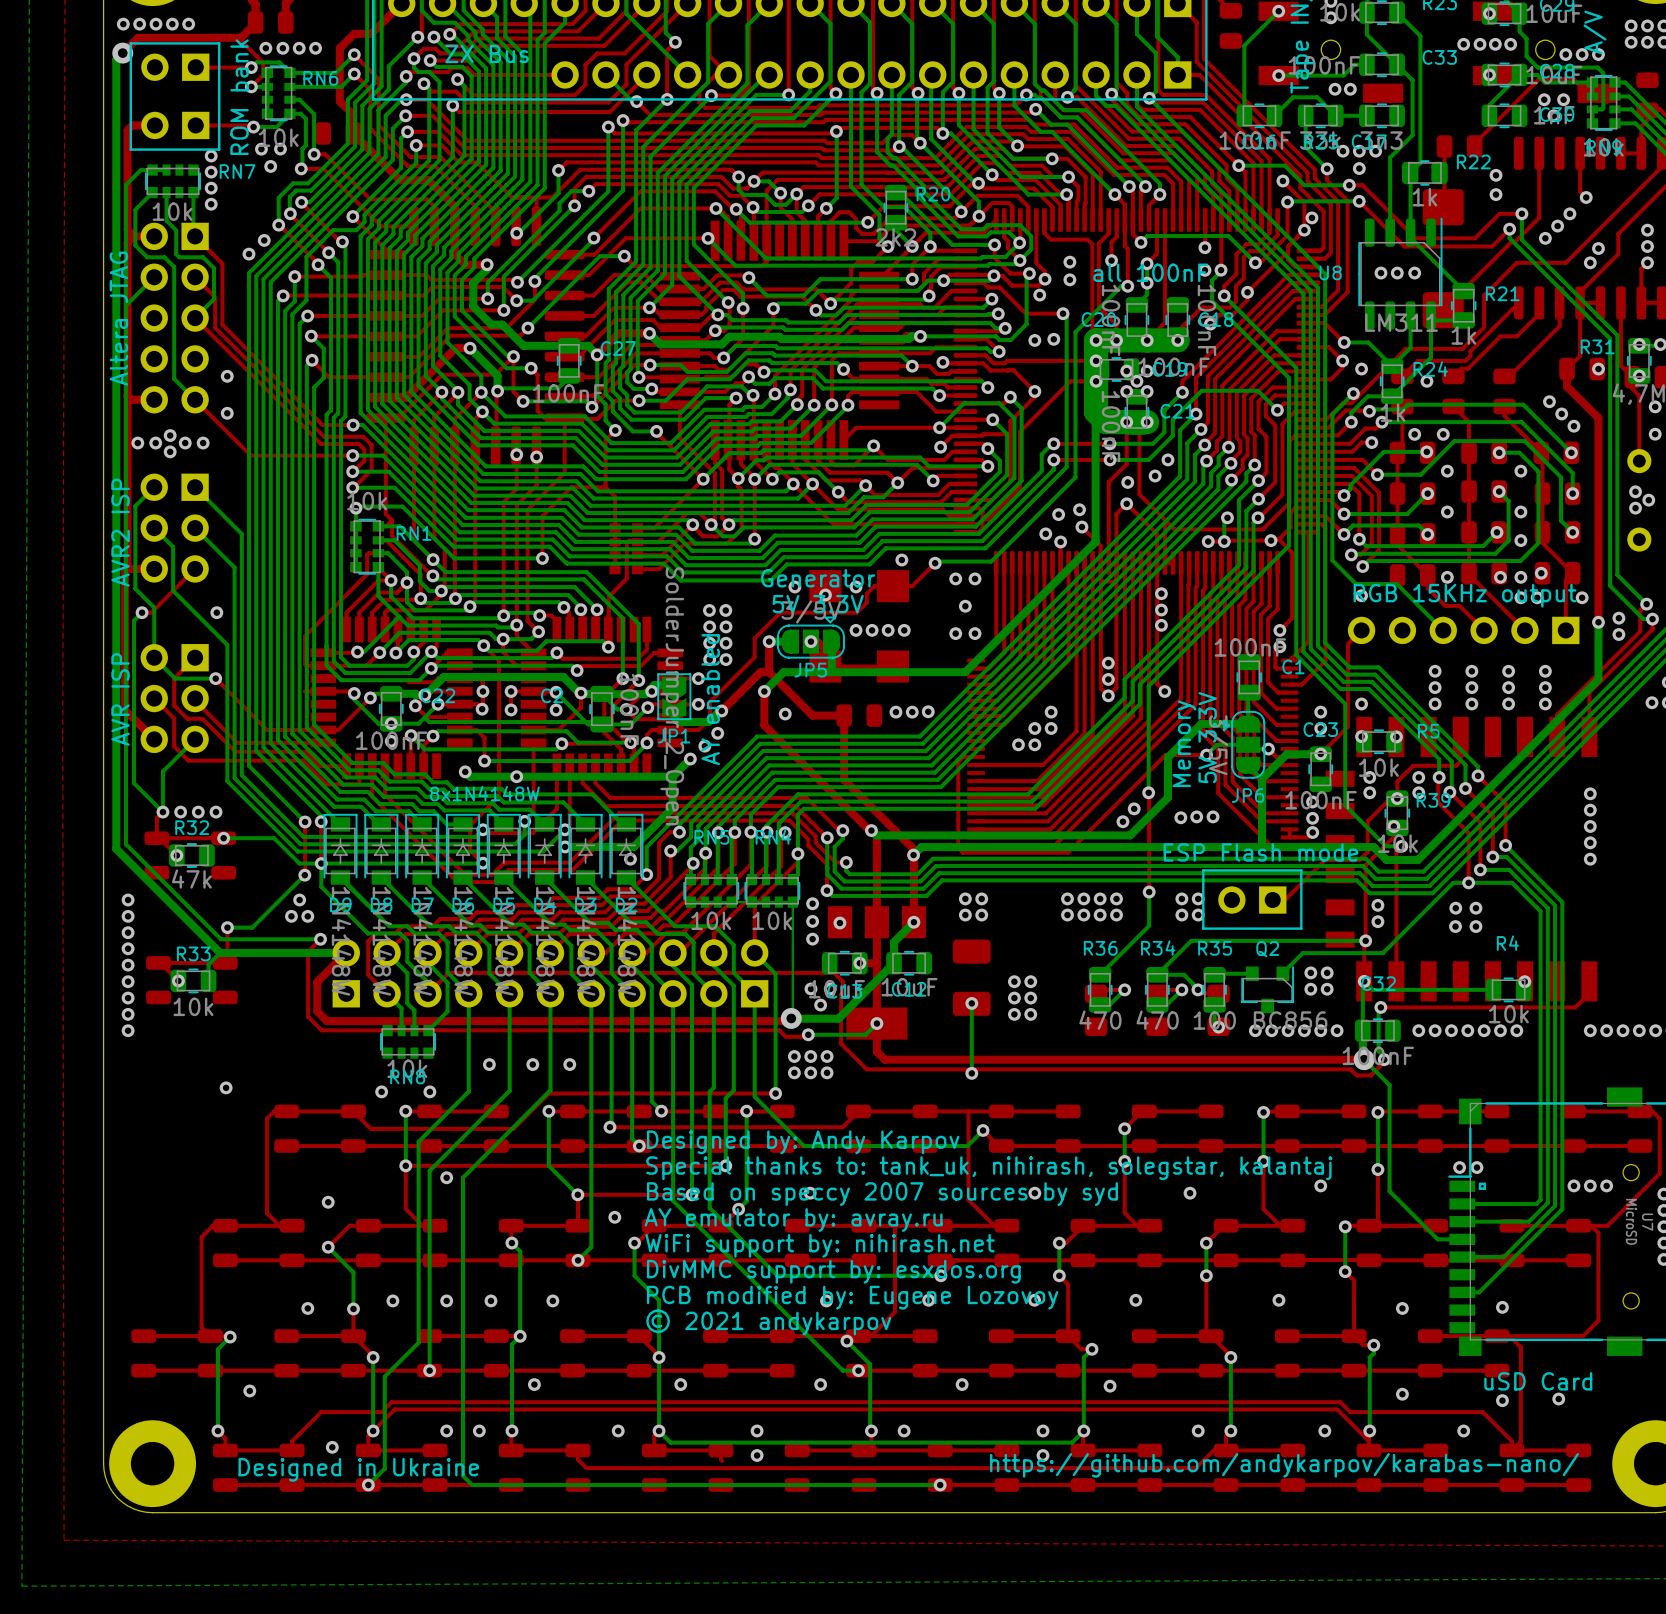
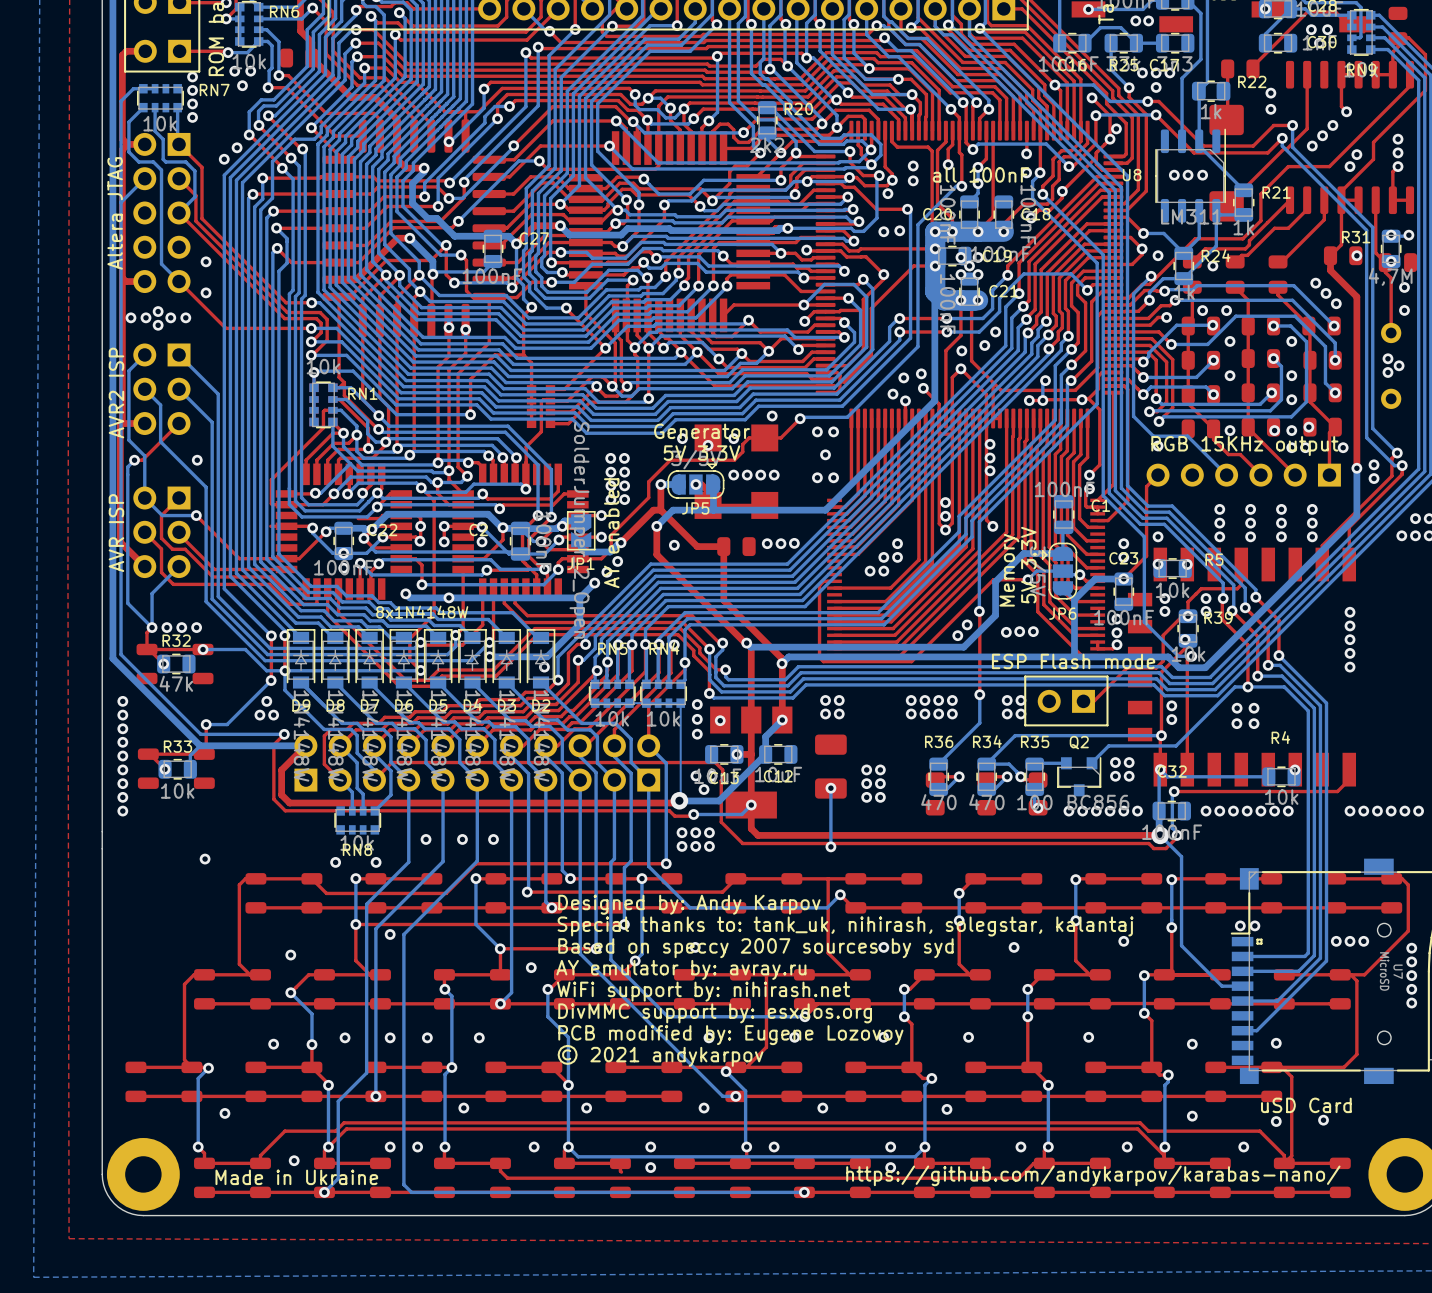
text: Designed in Ukraine (358, 1469) -> Made in Ukraine (296, 1177)

